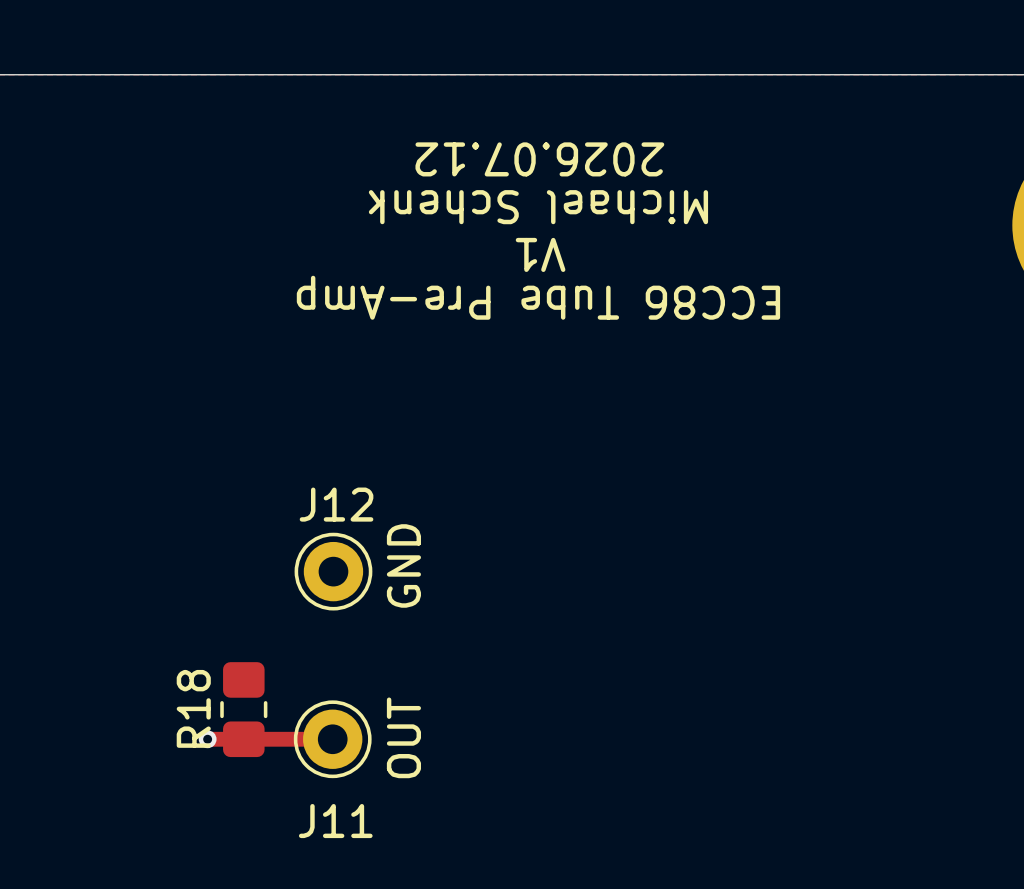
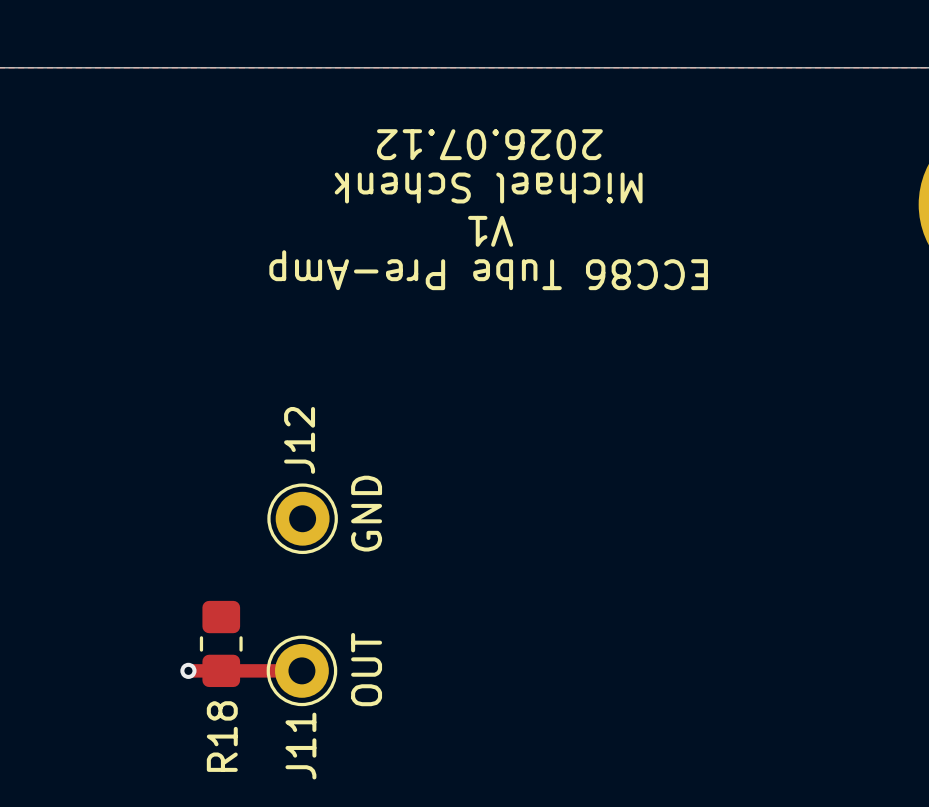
J12 name rotation: 0° (336, 504) -> 90° counterclockwise (299, 440)
R18 name position: R18 (193, 708) -> R18 (222, 736)
J11 name rotation: 0° (335, 821) -> 90° counterclockwise (300, 746)

